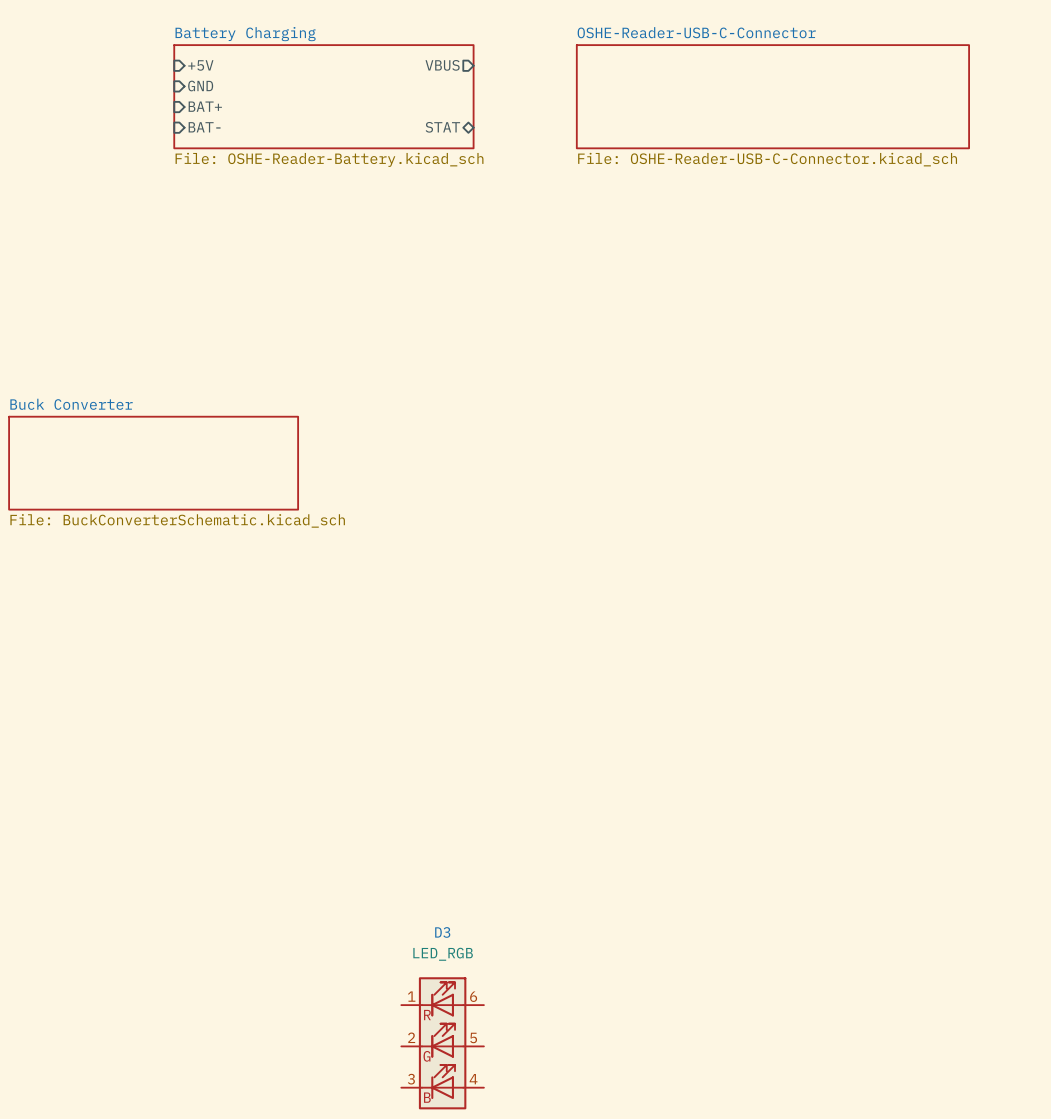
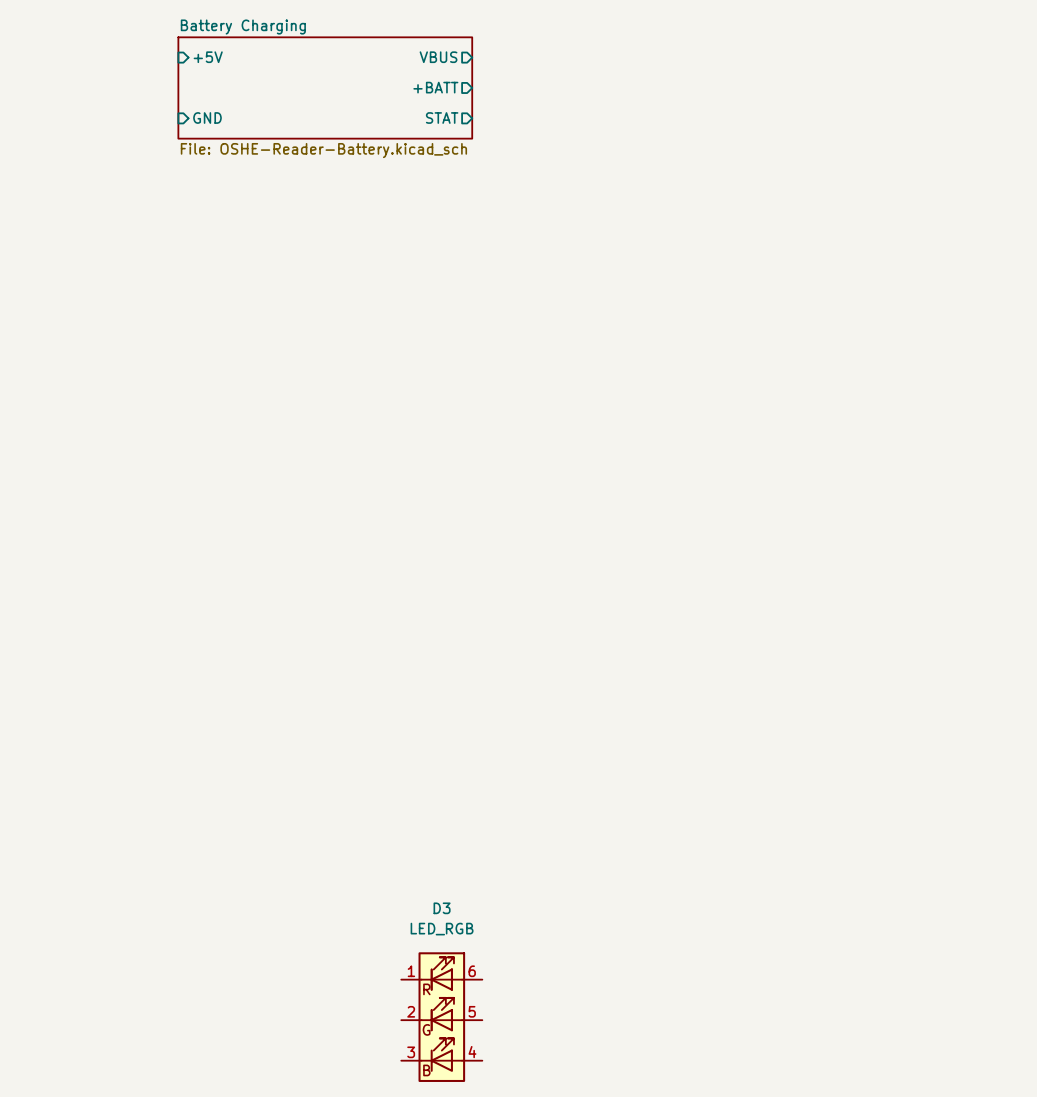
sheet pin: GND (200, 86) -> none
sheet pin: none -> +BATT (435, 87)
sheet OSHE-Reader-USB-C-Connector: File: OSHE-Reader-USB-C-Connector.kicad_sch (772, 96) -> none
sheet pin: BAT+ (205, 106) -> none
sheet pin: BAT- (204, 127) -> GND (207, 118)
sheet pin shape: bidirectional (442, 127) -> output (442, 118)
sheet Buck Converter: File: BuckConverterSchematic.kicad_sch (153, 463) -> none

